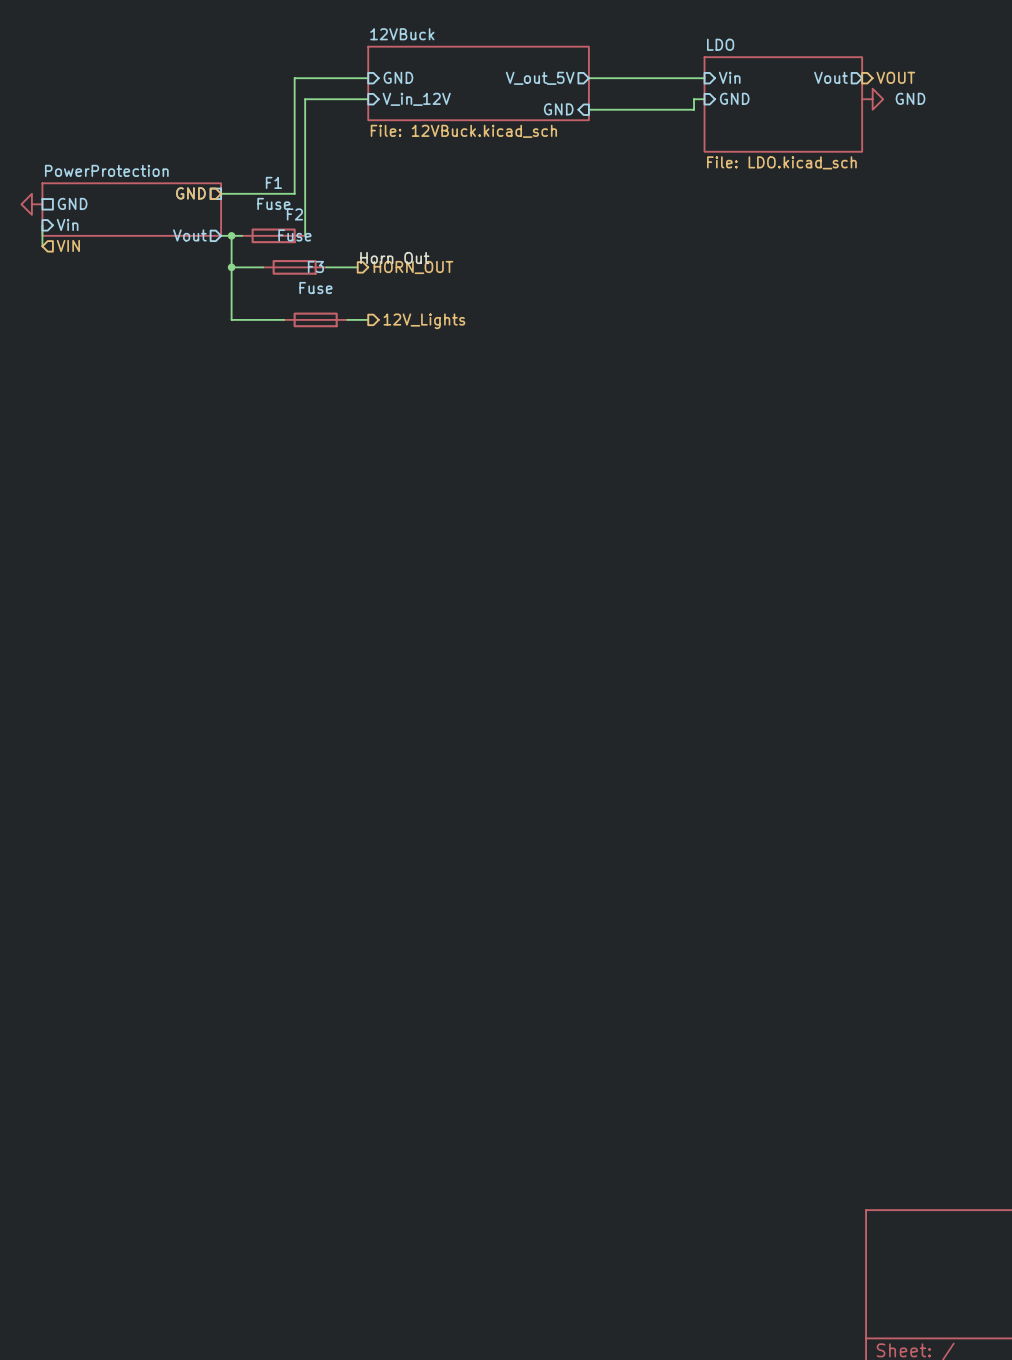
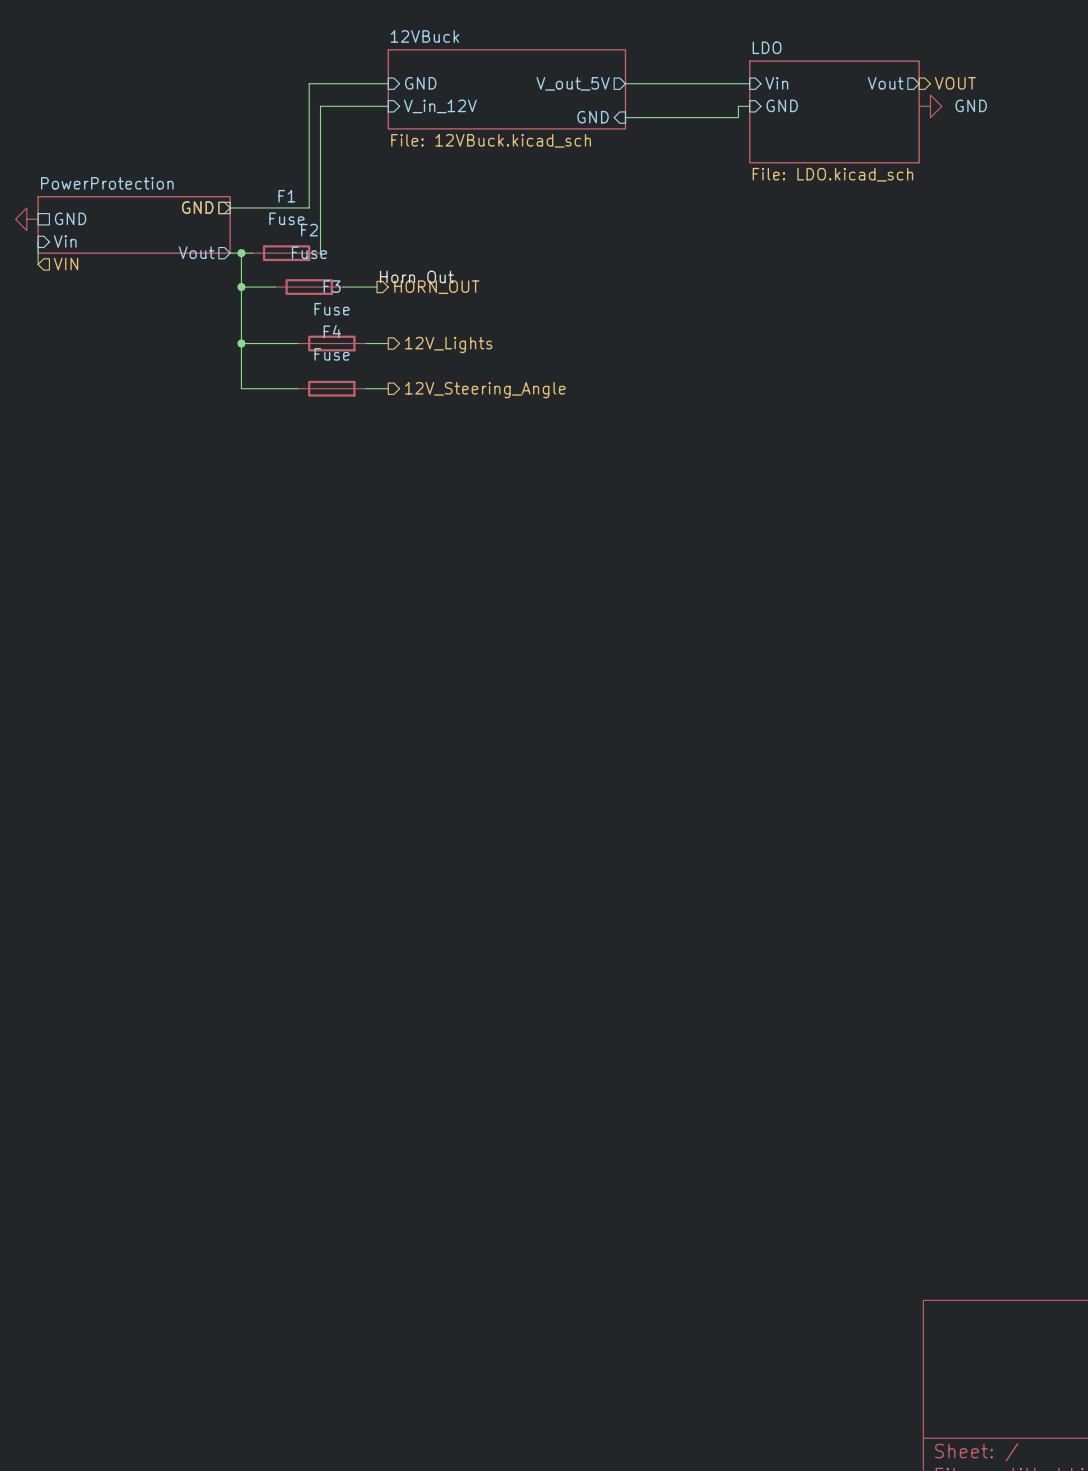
wire: none -> (241, 343) (241, 388) (297, 388)
junction: none -> (241, 343)
F4: none -> Fuse (331, 388)
wire: none -> (365, 388) (388, 388)
hierarchical label: none -> 12V_Steering_Angle (485, 390)

